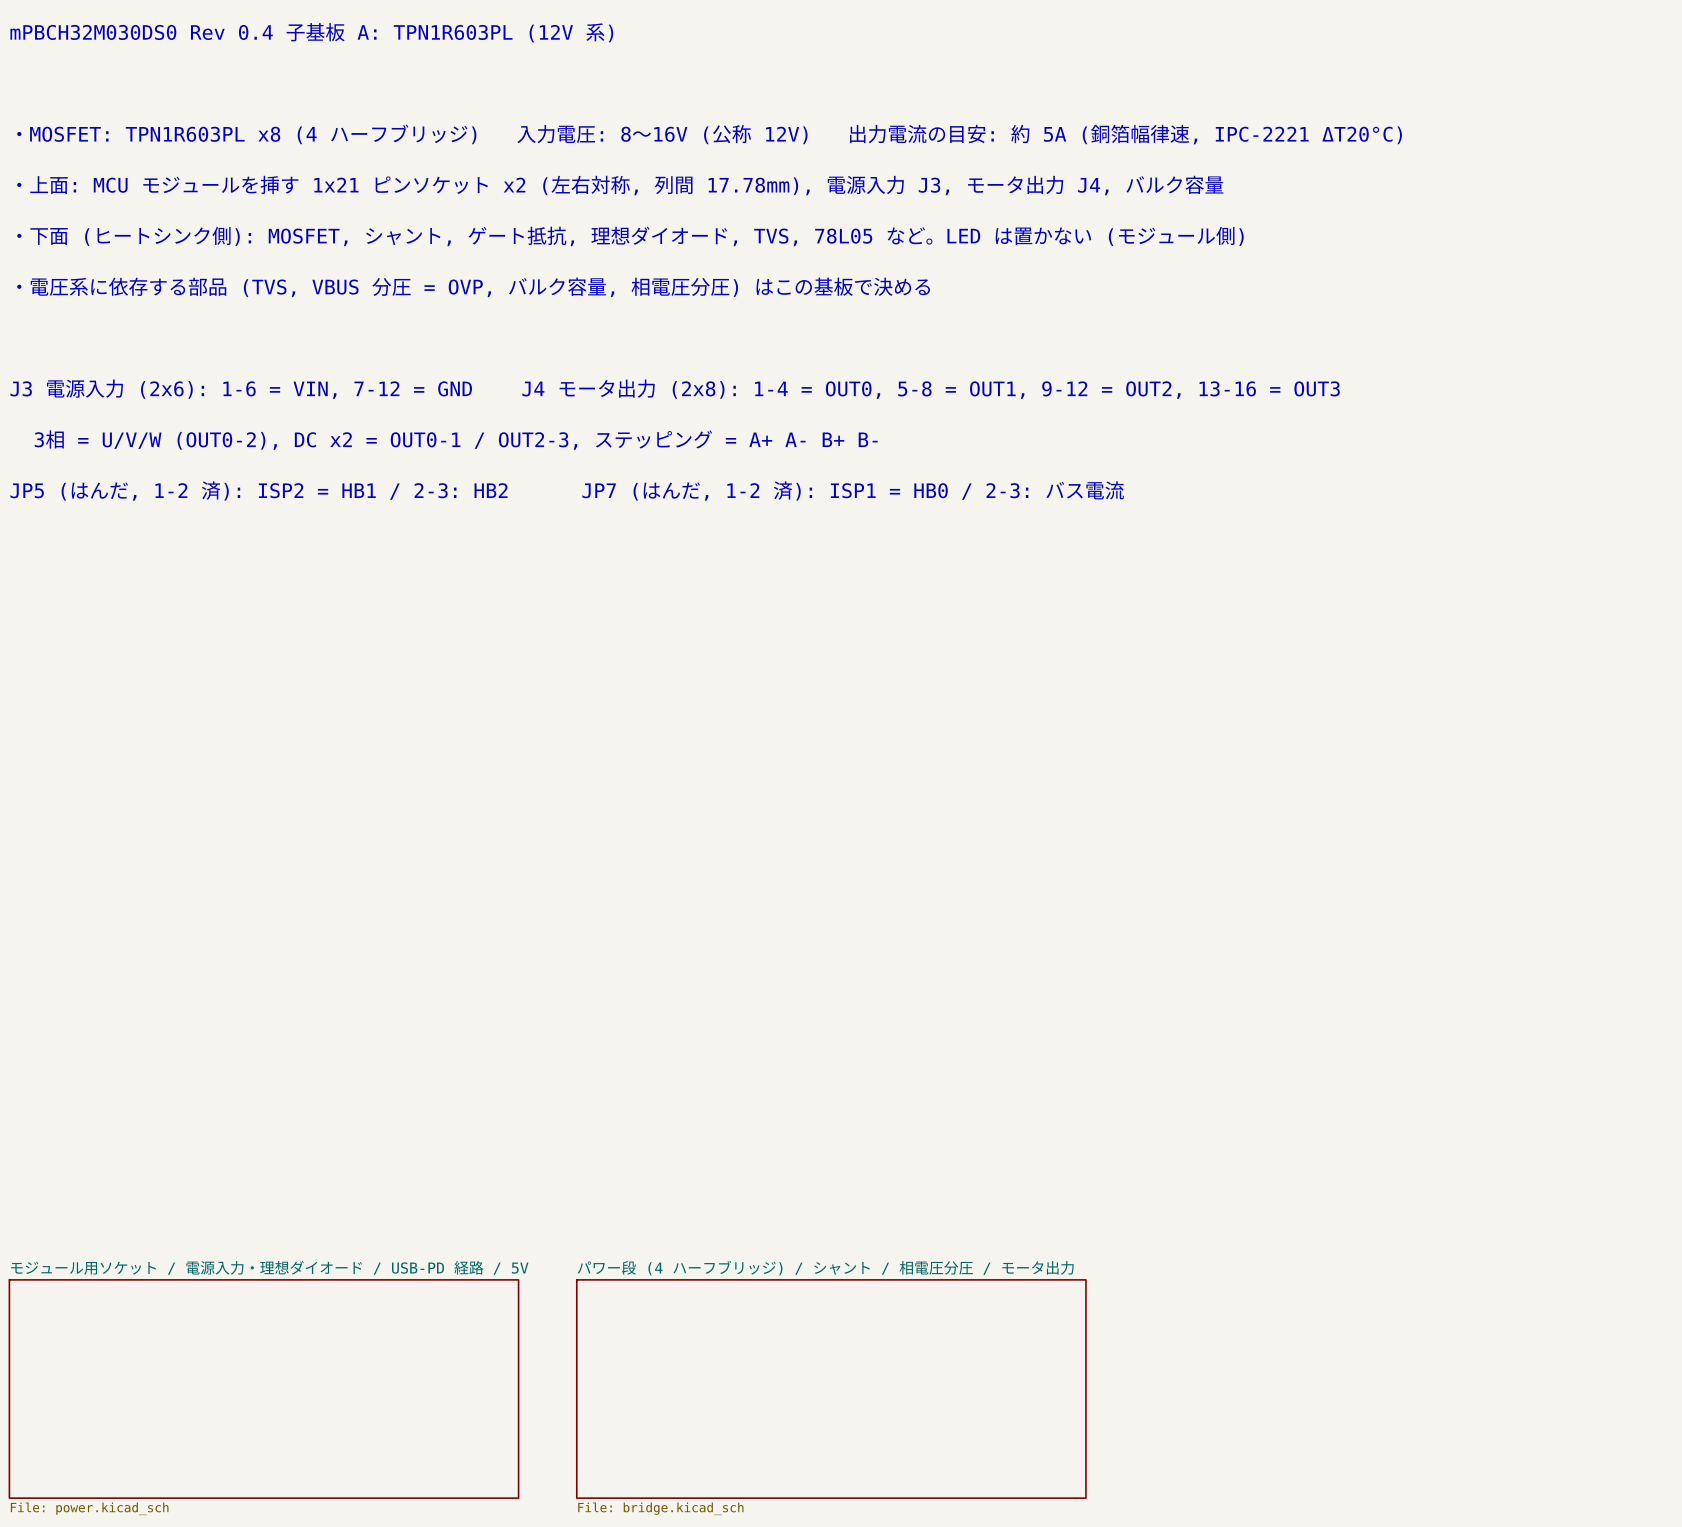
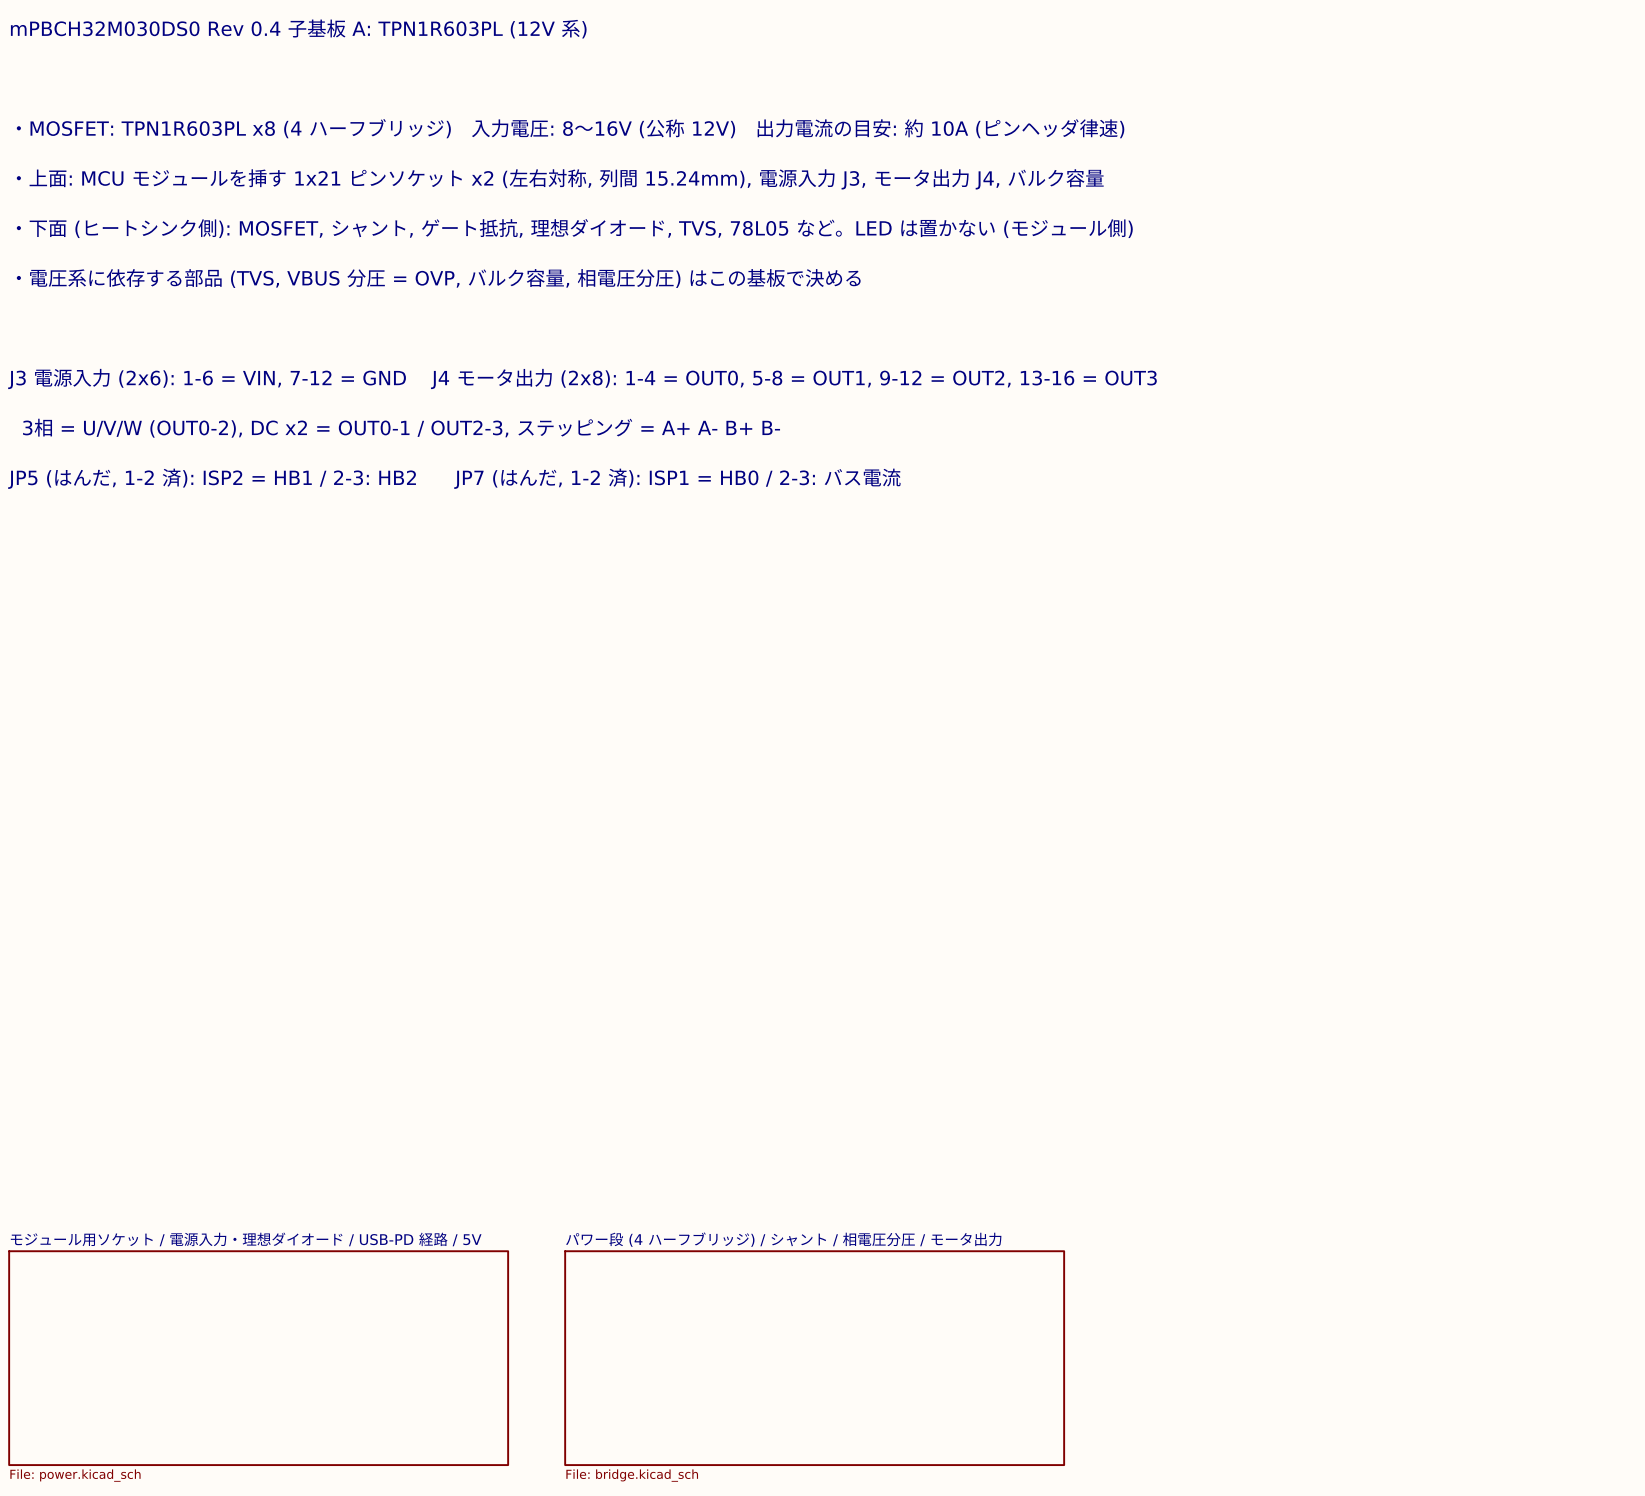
text: ・MOSFET: TPN1R603PL x8 (4 ハーフブリッジ) 入力電圧: 8〜16V (公称 12V) 出力電流の目安: 約 5A (銅箔幅律速, IPC-2221 ΔT20°C) (709, 134) -> ・MOSFET: TPN1R603PL x8 (4 ハーフブリッジ) 入力電圧: 8〜16V (公称 12V) 出力電流の目安: 約 10A (ピンヘッダ律速) (570, 128)
text: ・上面: MCU モジュールを挿す 1x21 ピンソケット x2 (左右対称, 列間 17.78mm), 電源入力 J3, モータ出力 J4, バルク容量 (620, 185) -> ・上面: MCU モジュールを挿す 1x21 ピンソケット x2 (左右対称, 列間 15.24mm), 電源入力 J3, モータ出力 J4, バルク容量 (560, 179)

